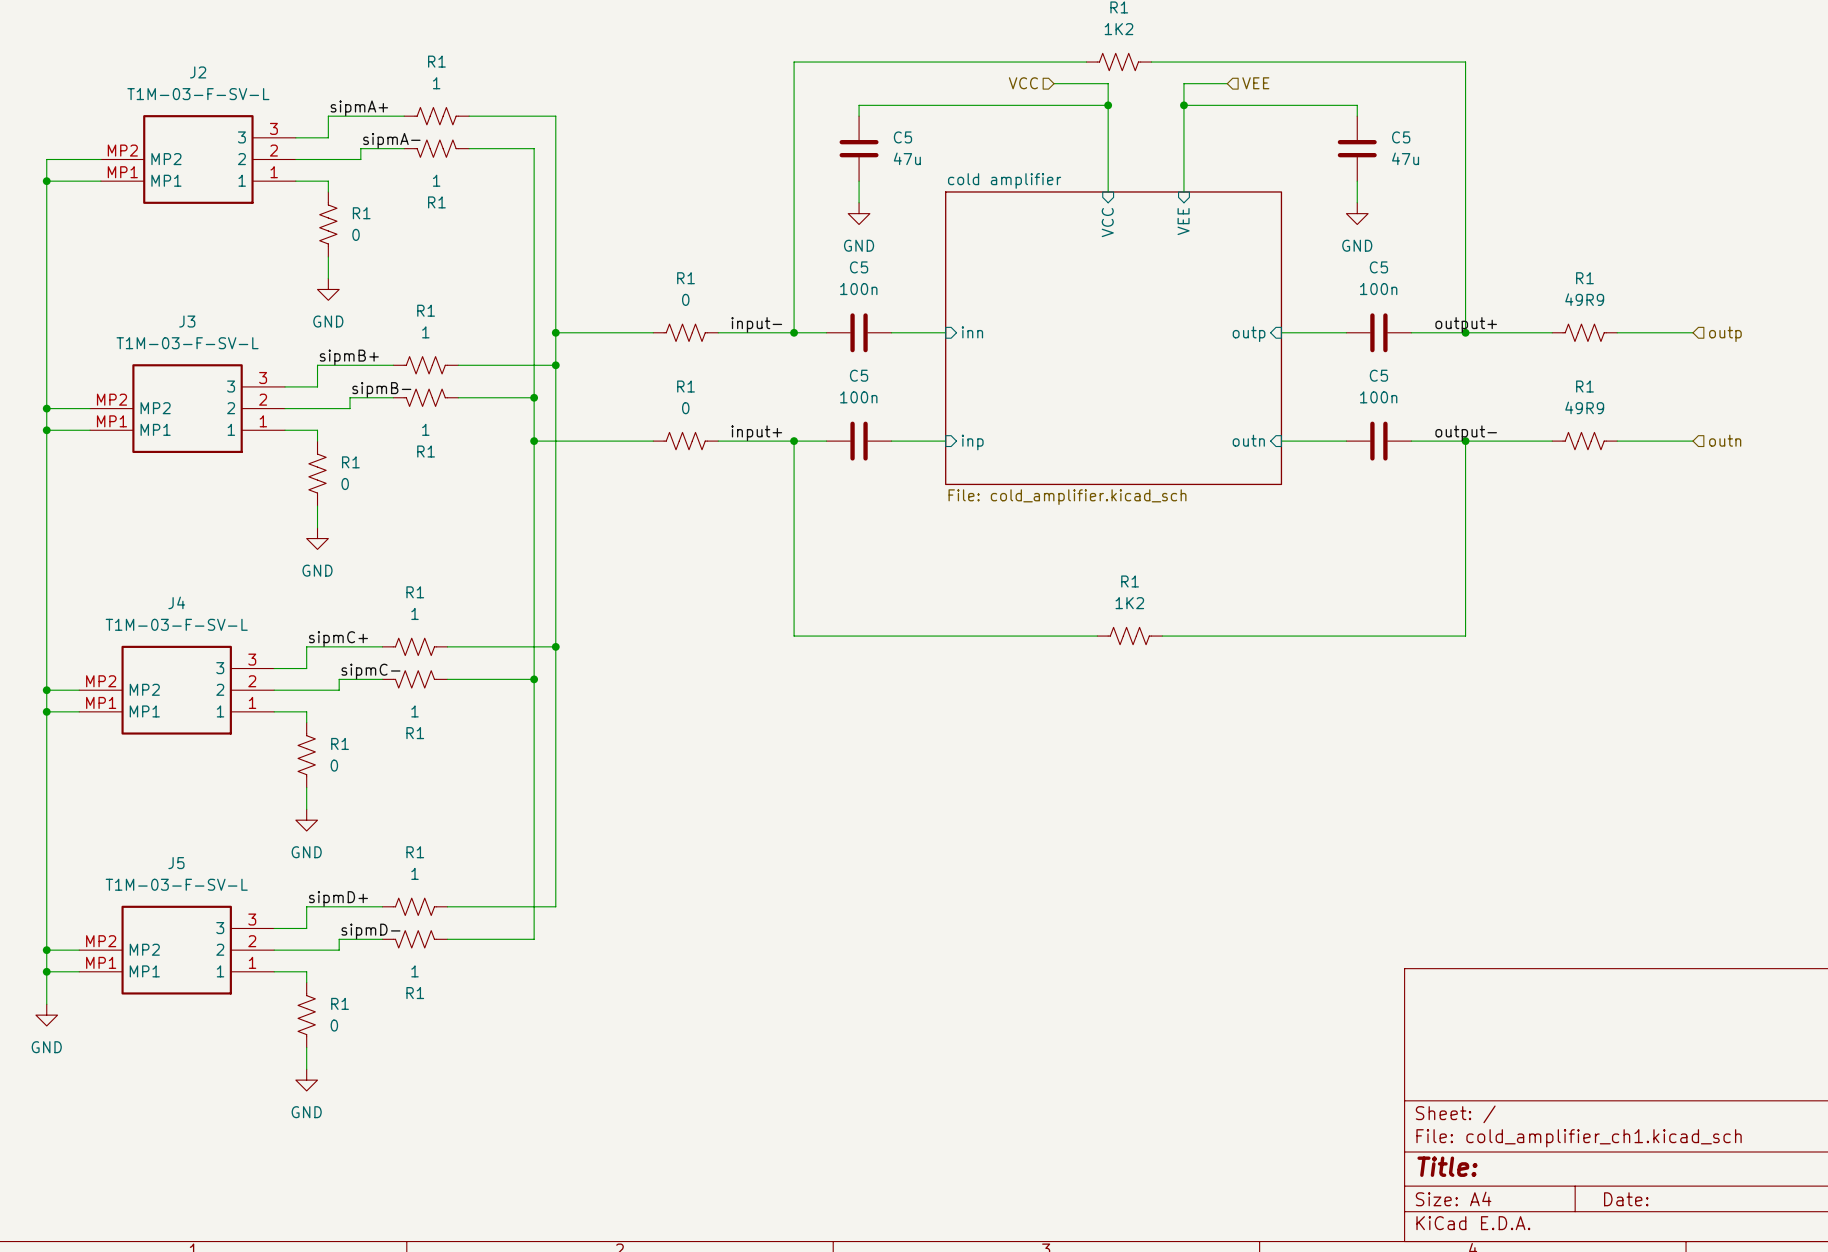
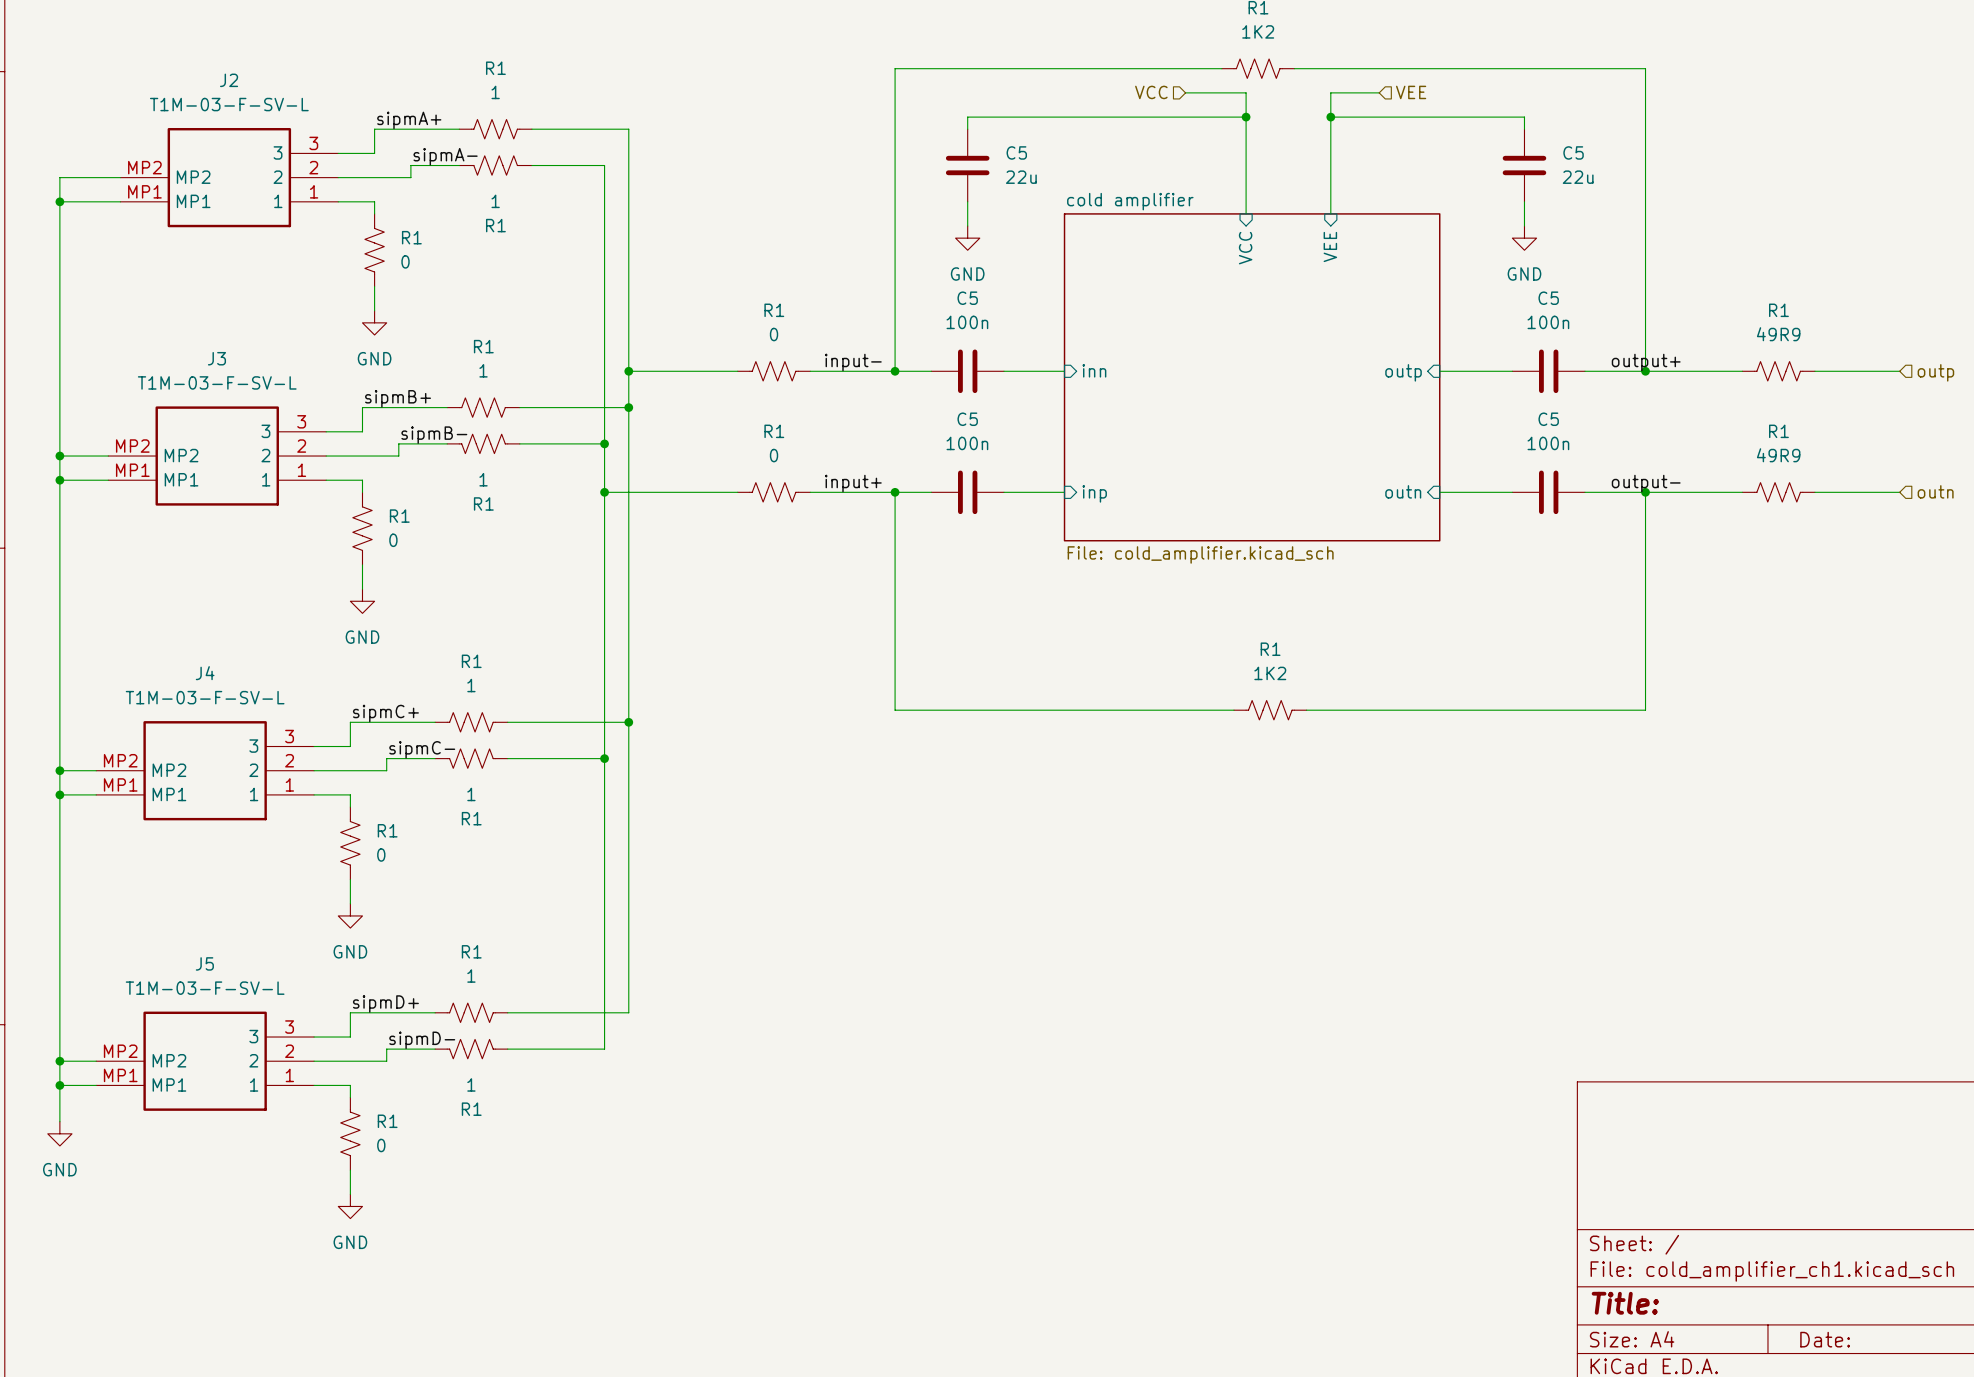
C5 value: 47u (907, 158) -> 22u (1021, 177)
C5 value: 47u (1405, 158) -> 22u (1578, 177)

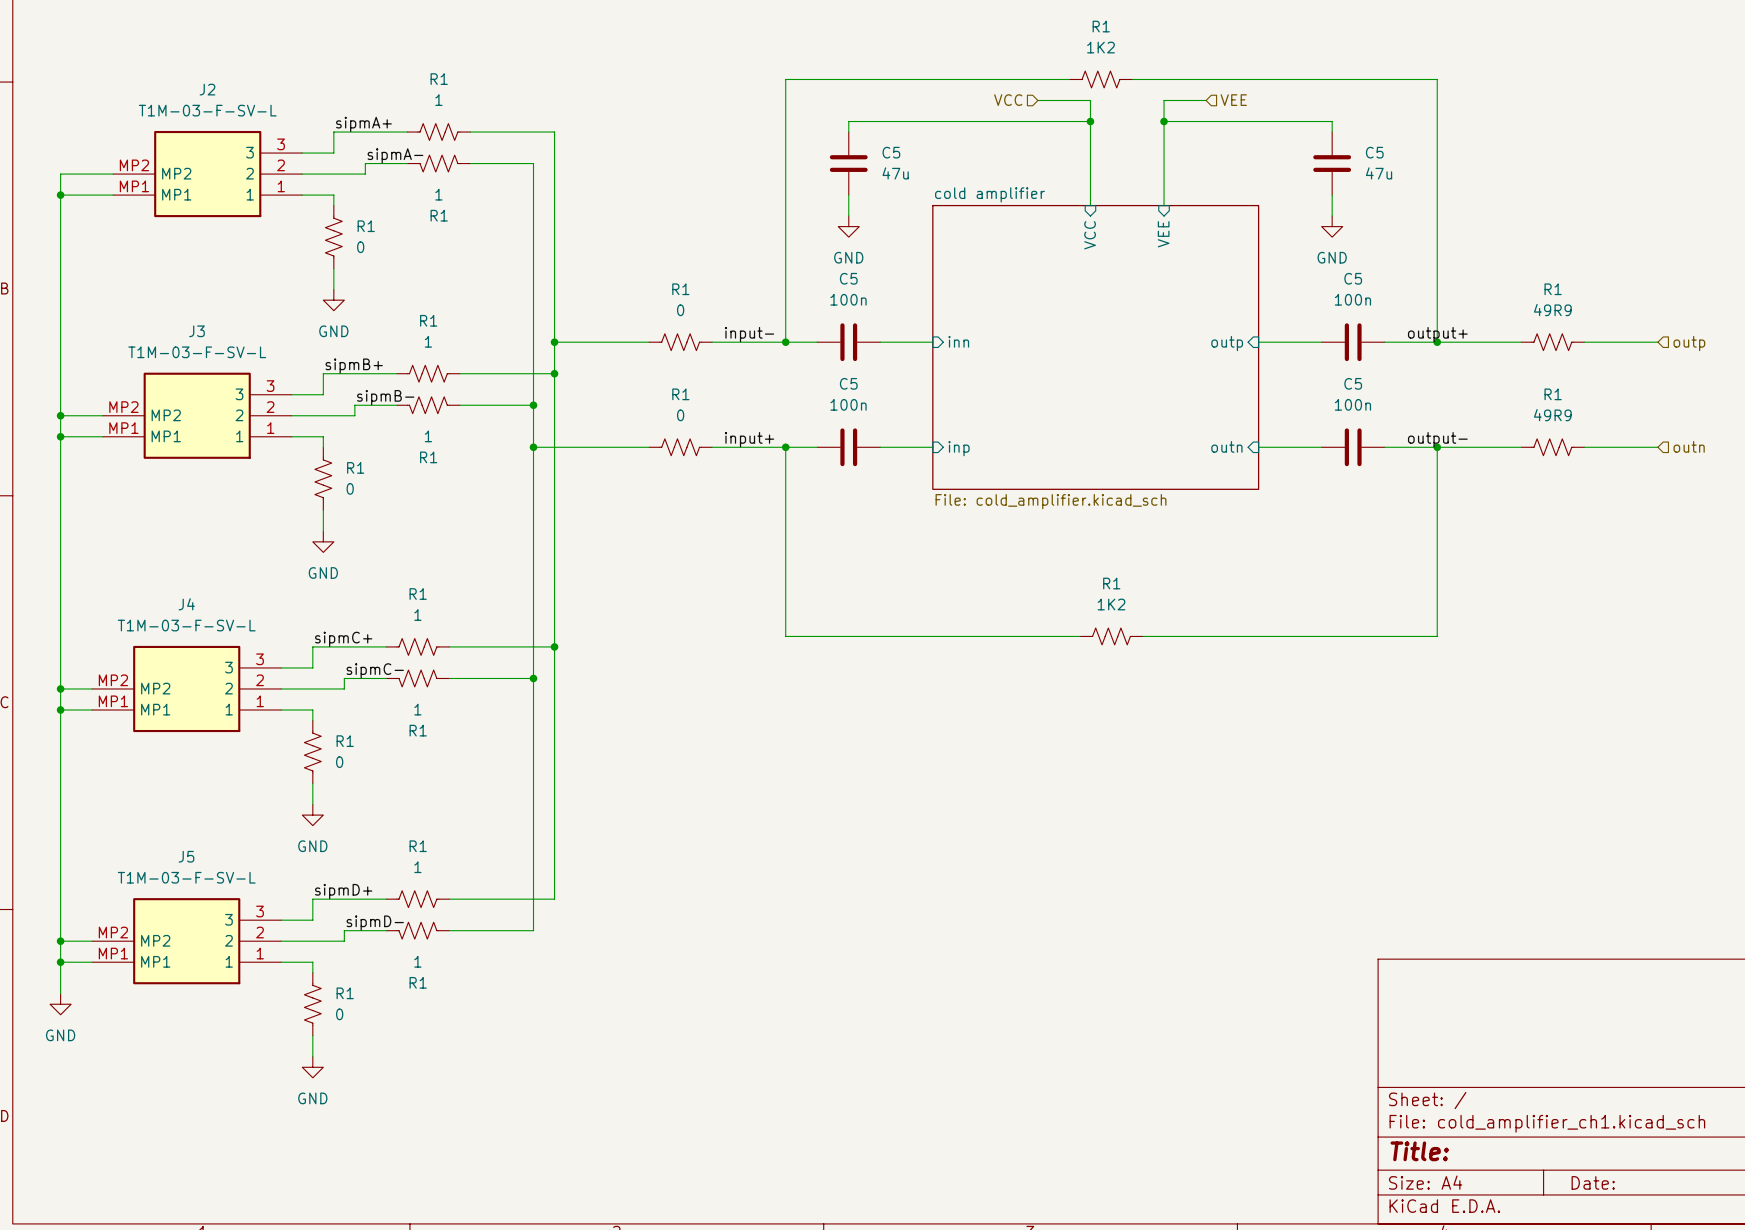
J2 symbol: [120, 127, 339, 228] -> [113, 130, 303, 218]
C5 value: 22u (1021, 177) -> 47u (895, 173)
C5 value: 22u (1578, 177) -> 47u (1379, 173)
J3 symbol: [108, 406, 327, 506] -> [102, 372, 292, 459]
J4 symbol: [96, 721, 315, 821] -> [92, 645, 282, 733]
J5 symbol: [96, 1011, 315, 1111] -> [92, 898, 282, 985]

